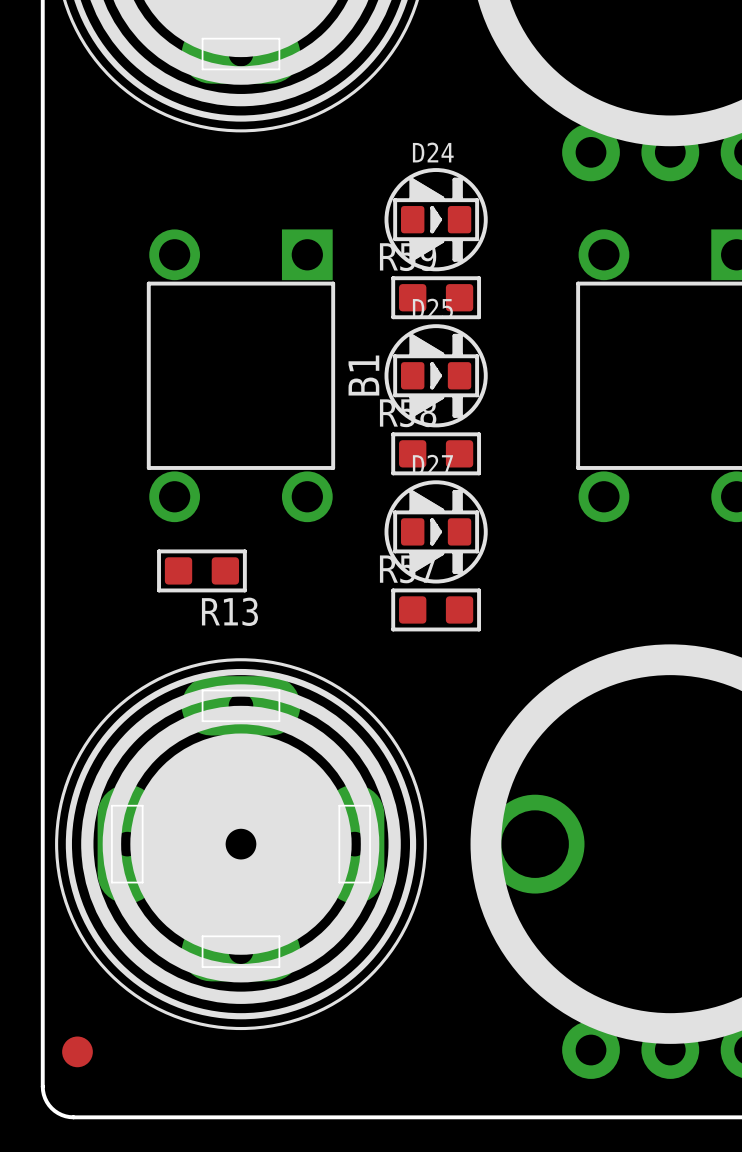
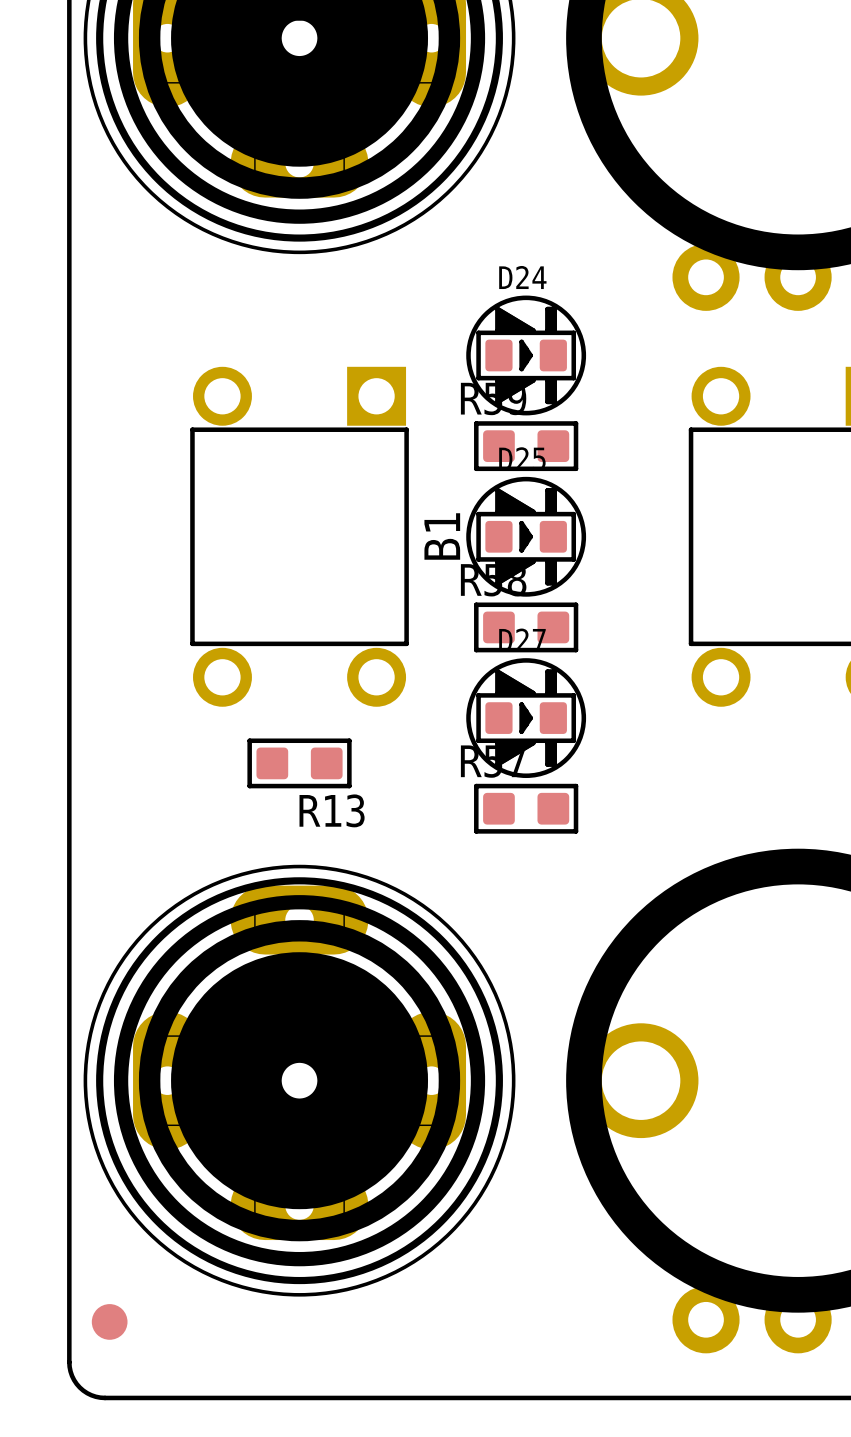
R13 position: (201, 570) -> (299, 763)

